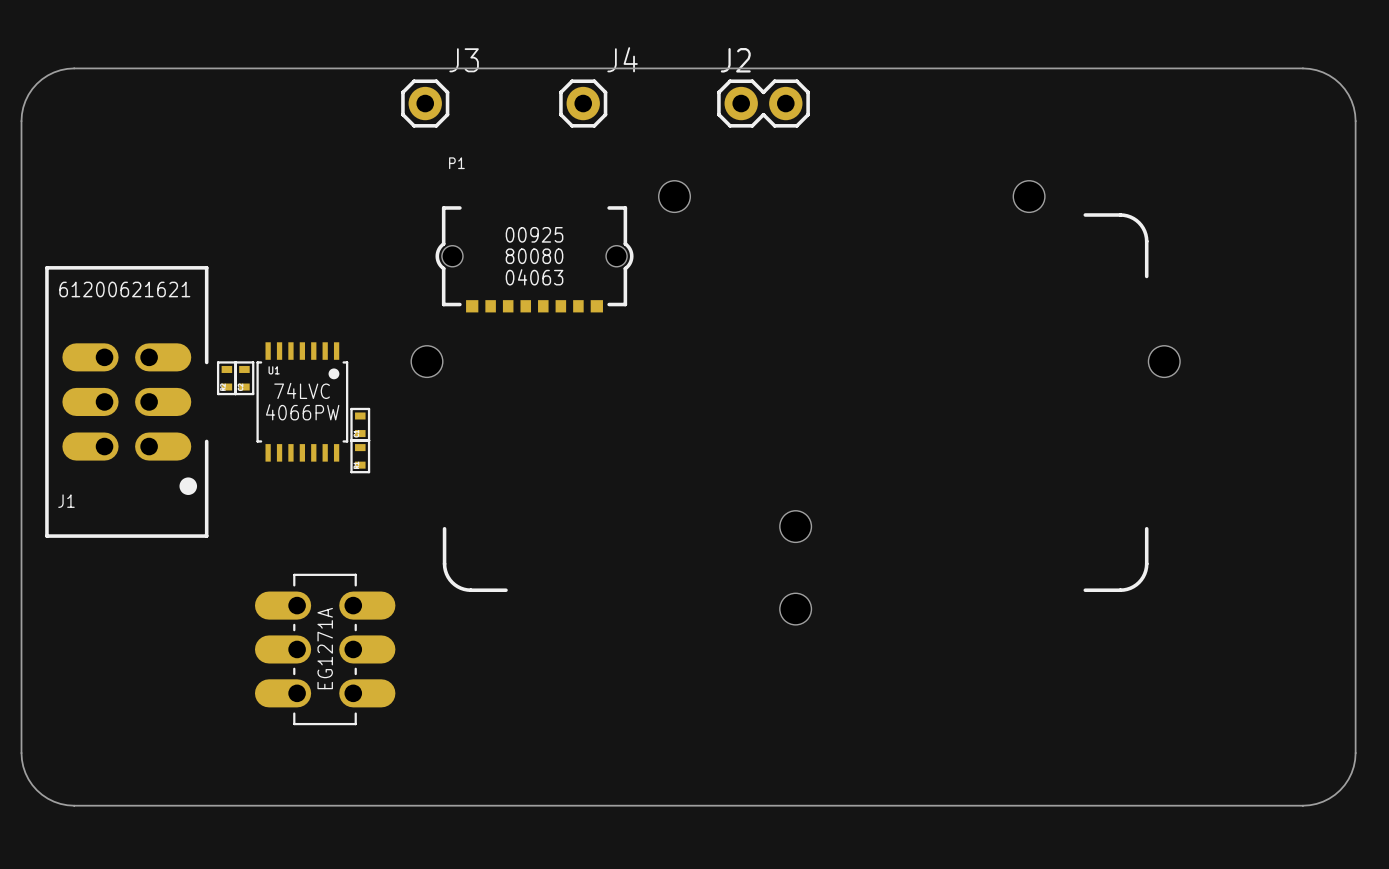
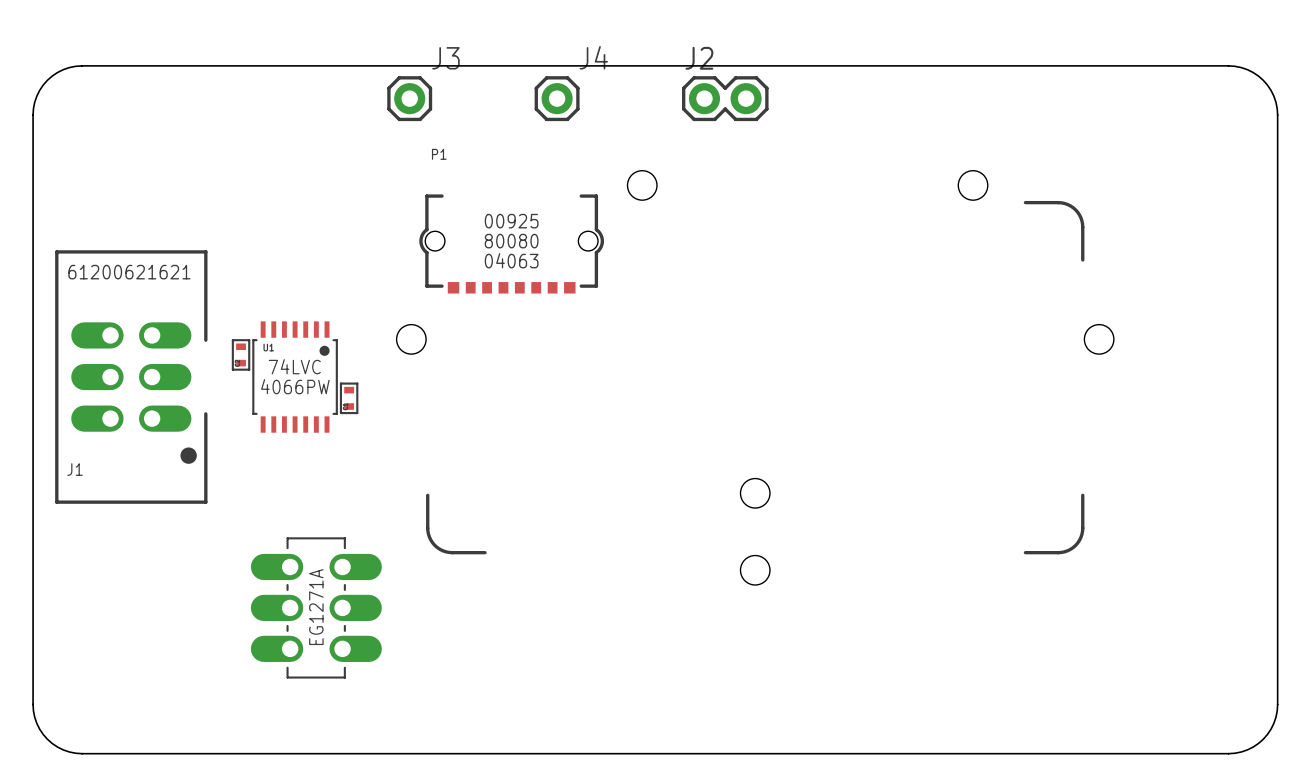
part: (226, 378) -> none
part: (360, 456) -> none

